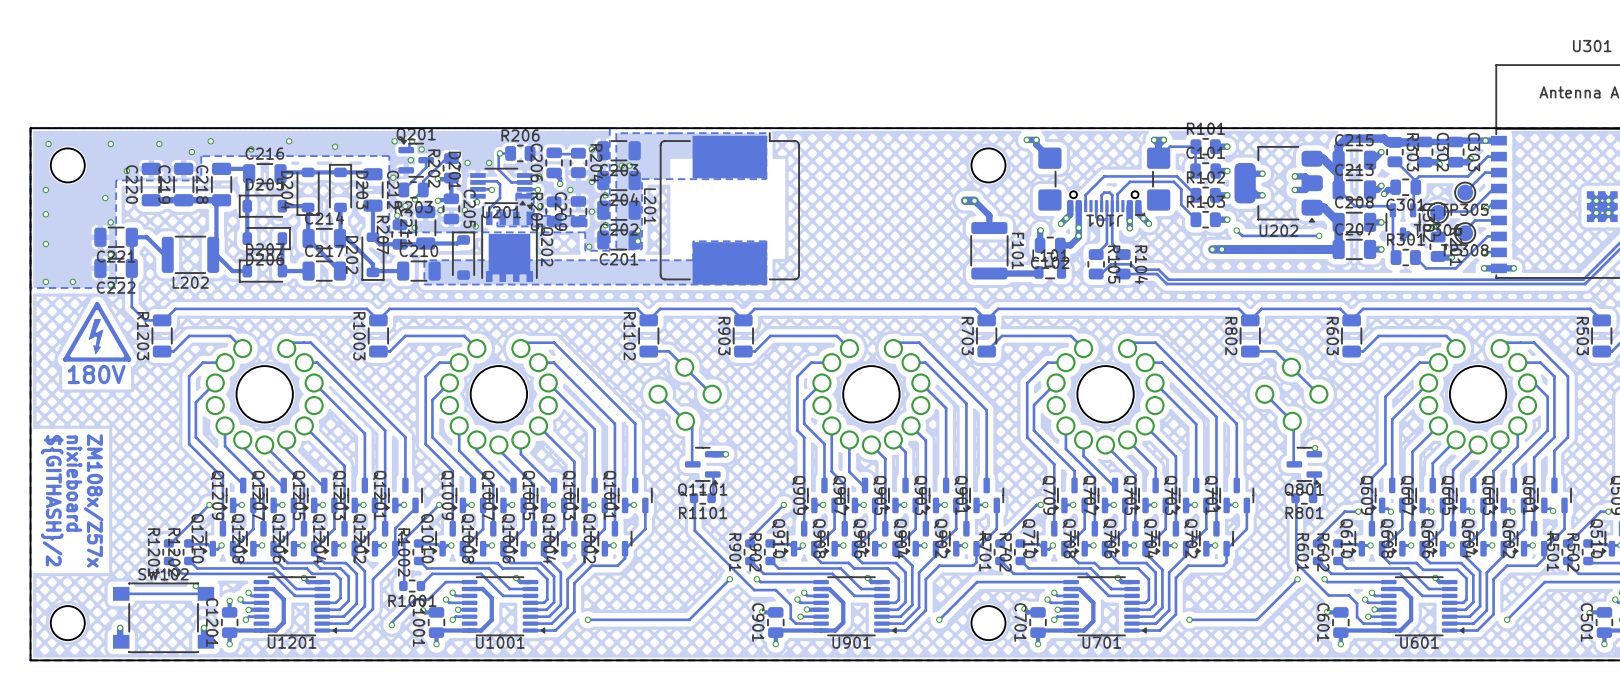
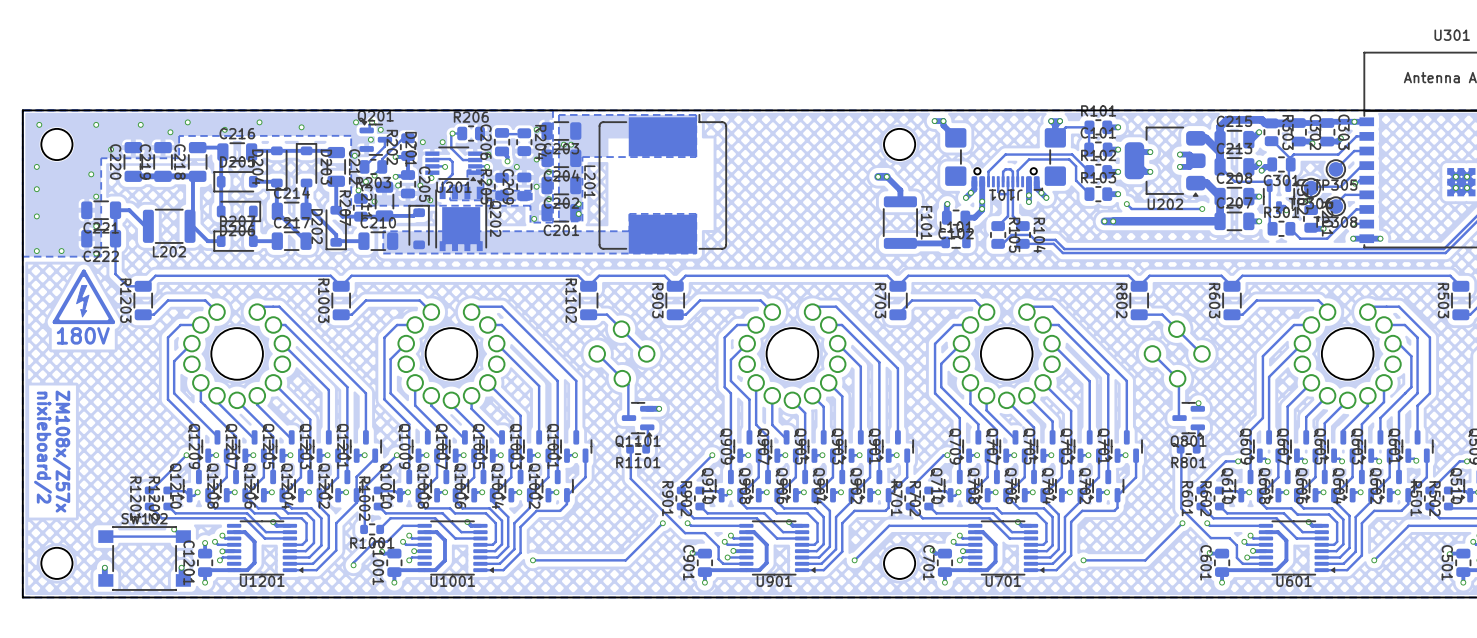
text: nixieboard (74, 483) -> ZM108x/Z57x (61, 451)
text: ${GITHASH}/2 (52, 500) -> nixieboard/2 (42, 447)
text: ZM108x/Z57x (93, 500) -> none

